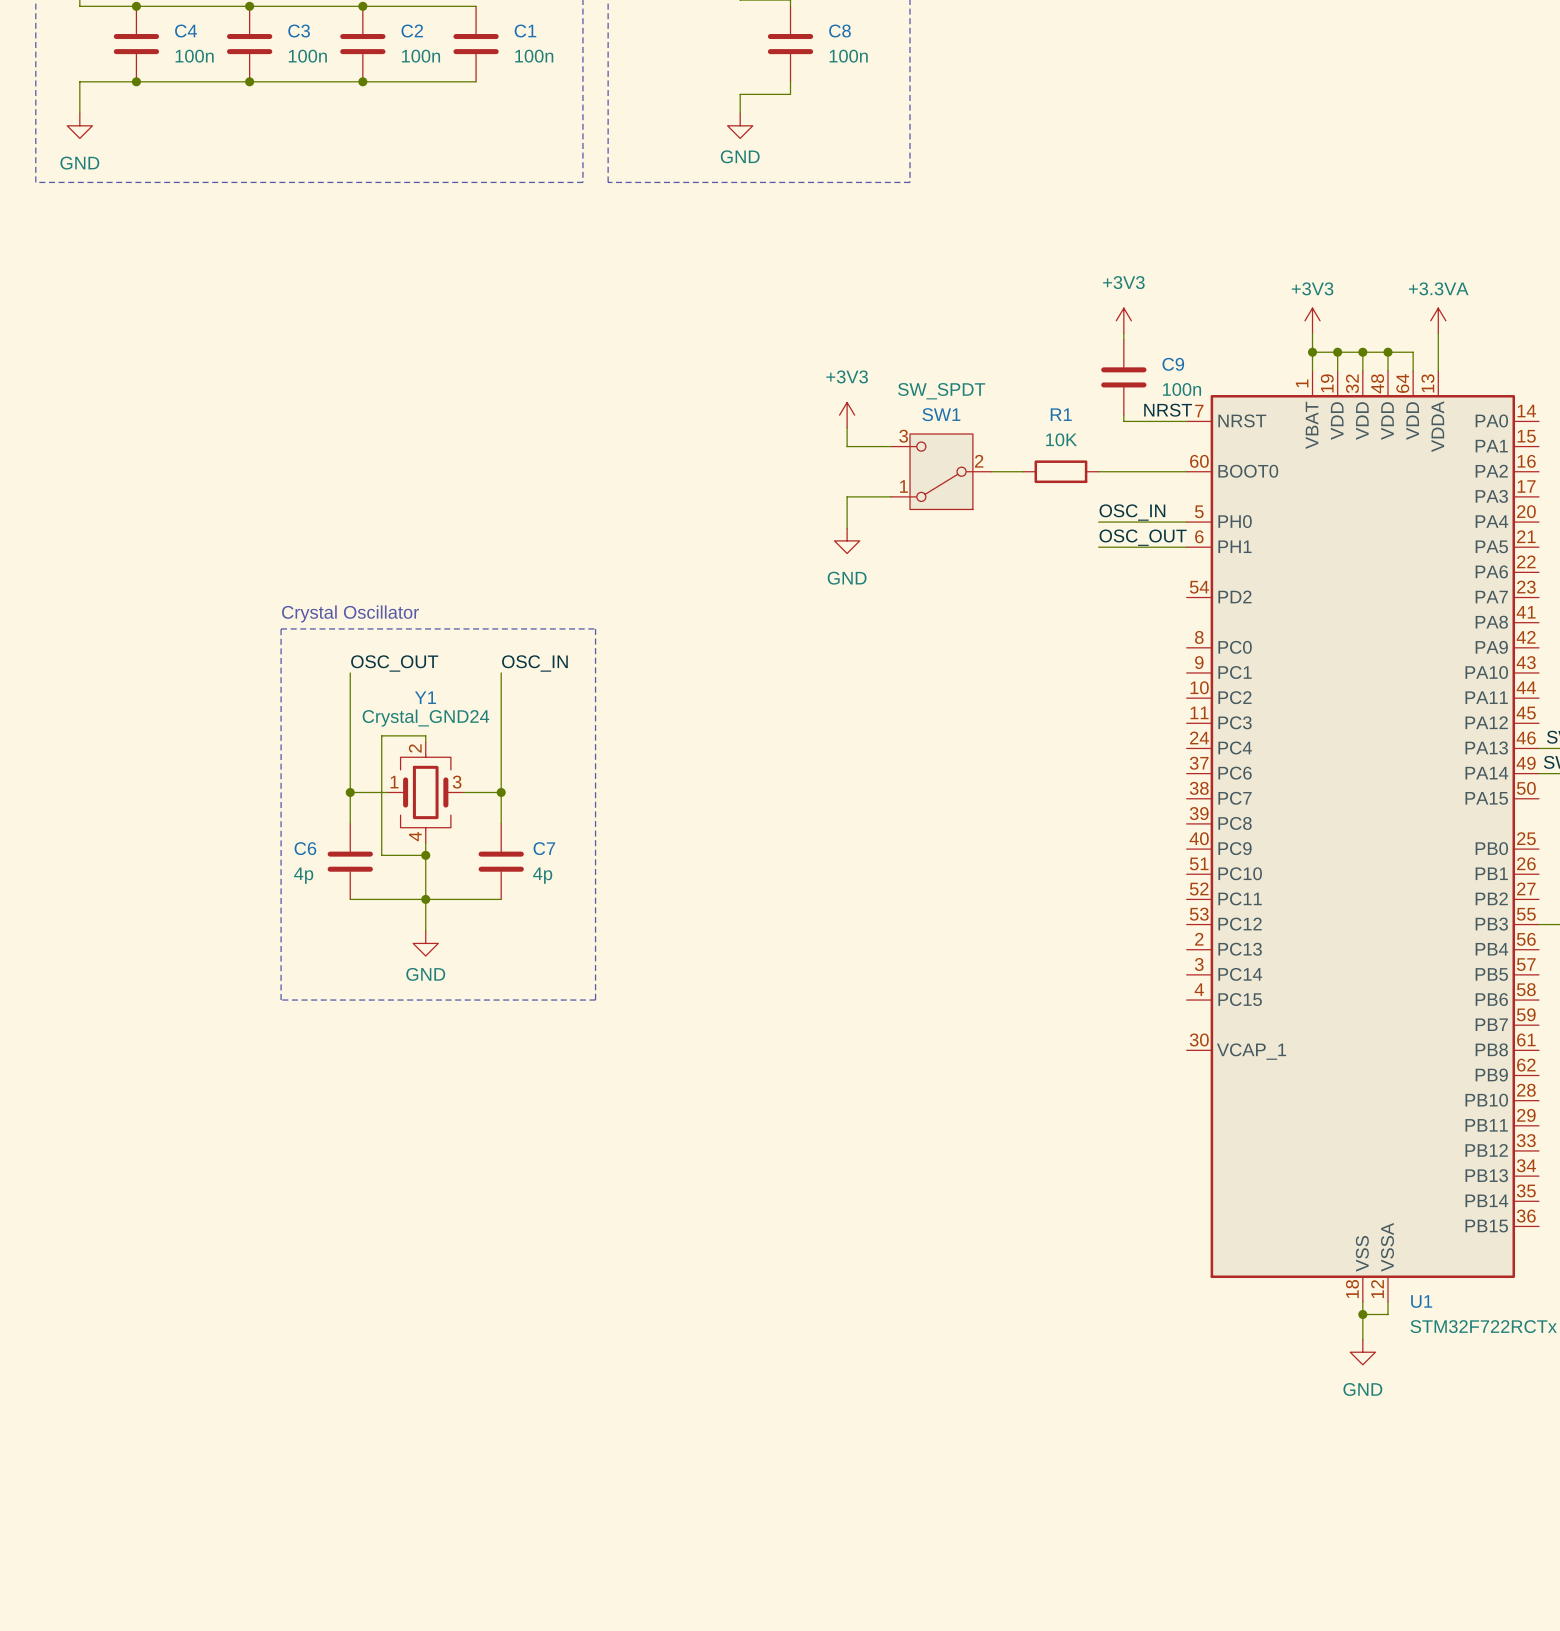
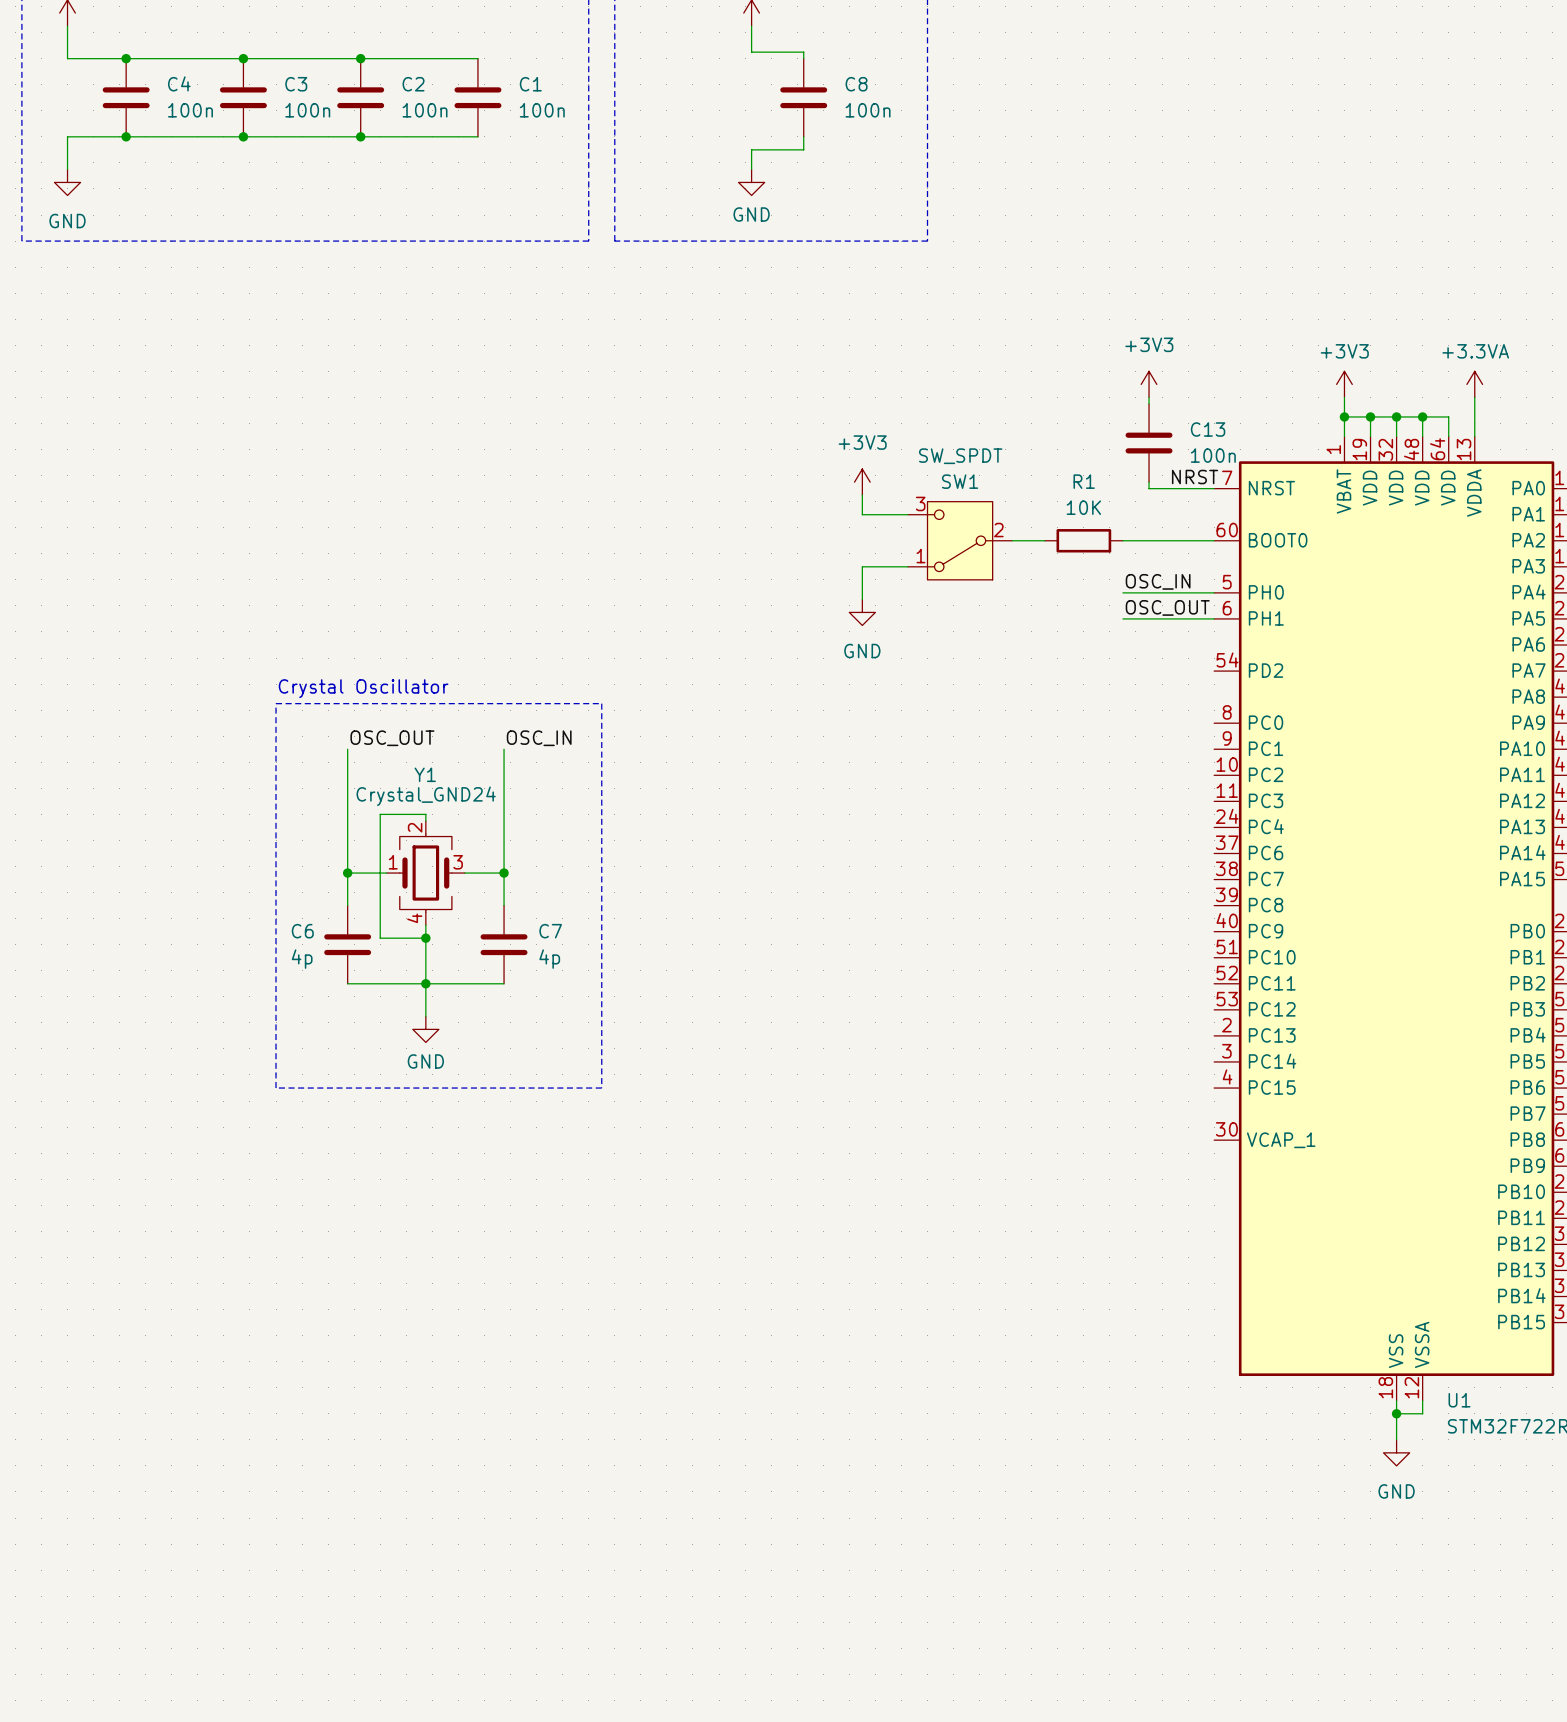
C9 name: C9 (1173, 364) -> C13 (1208, 429)

